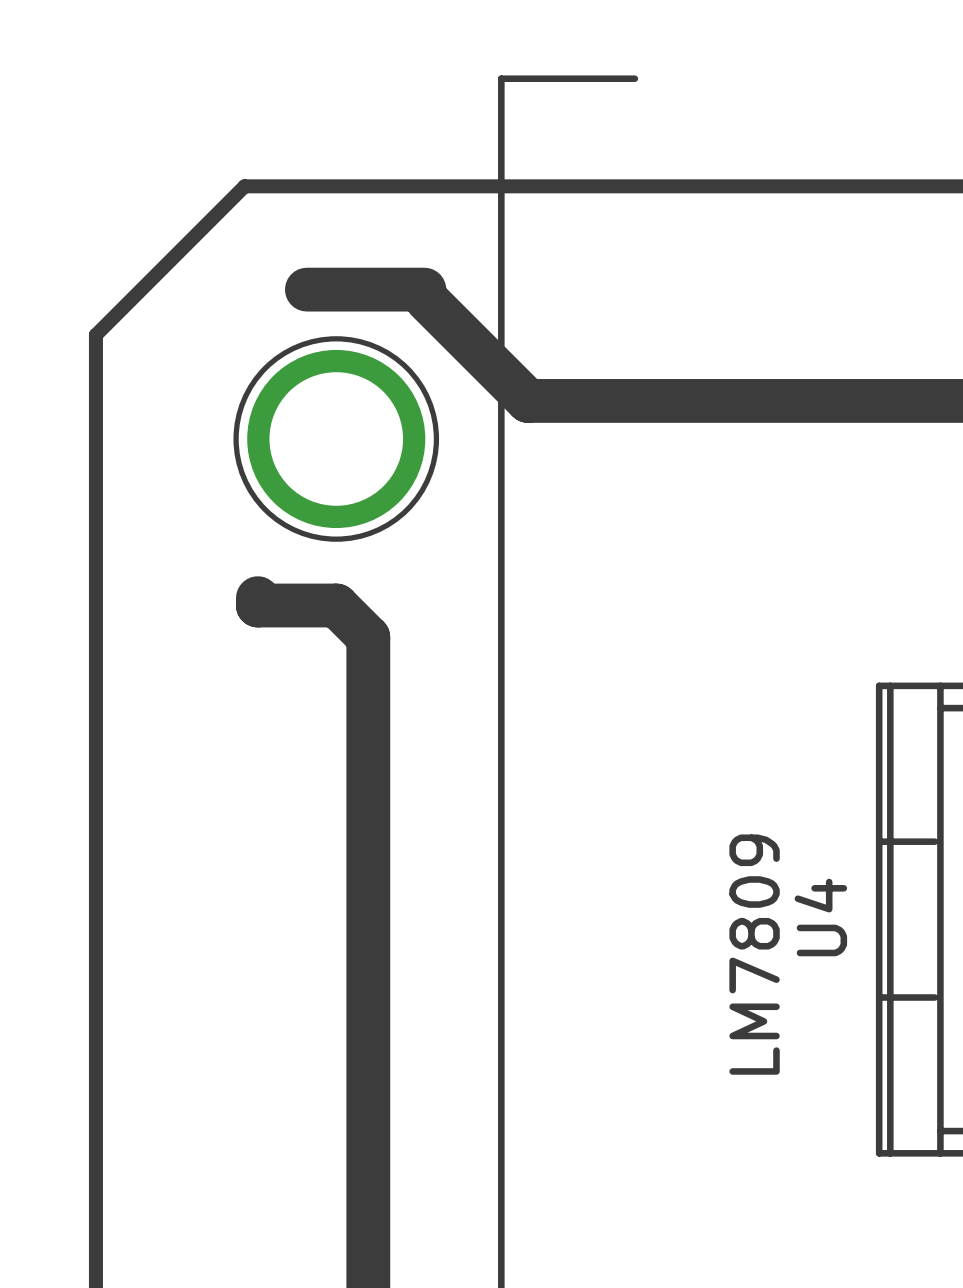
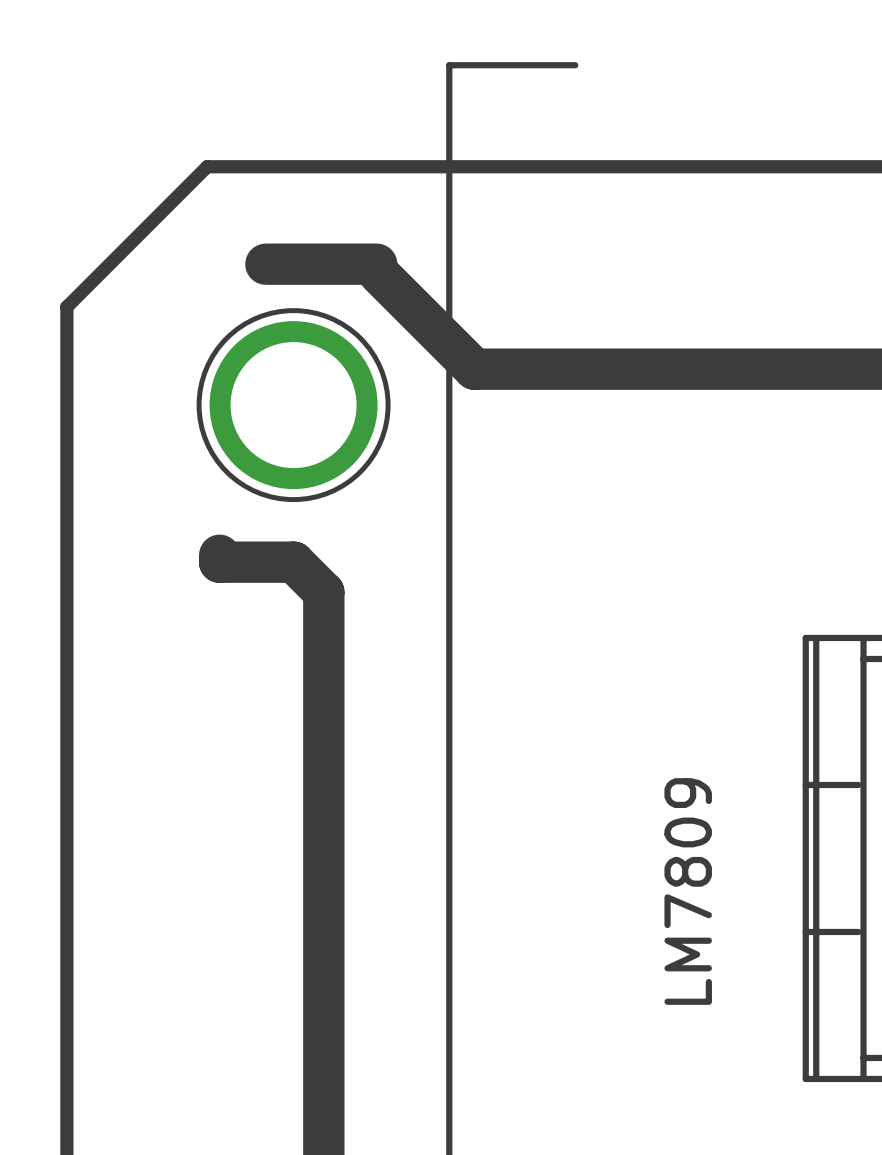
U4 name: U4 (820, 917) -> none

